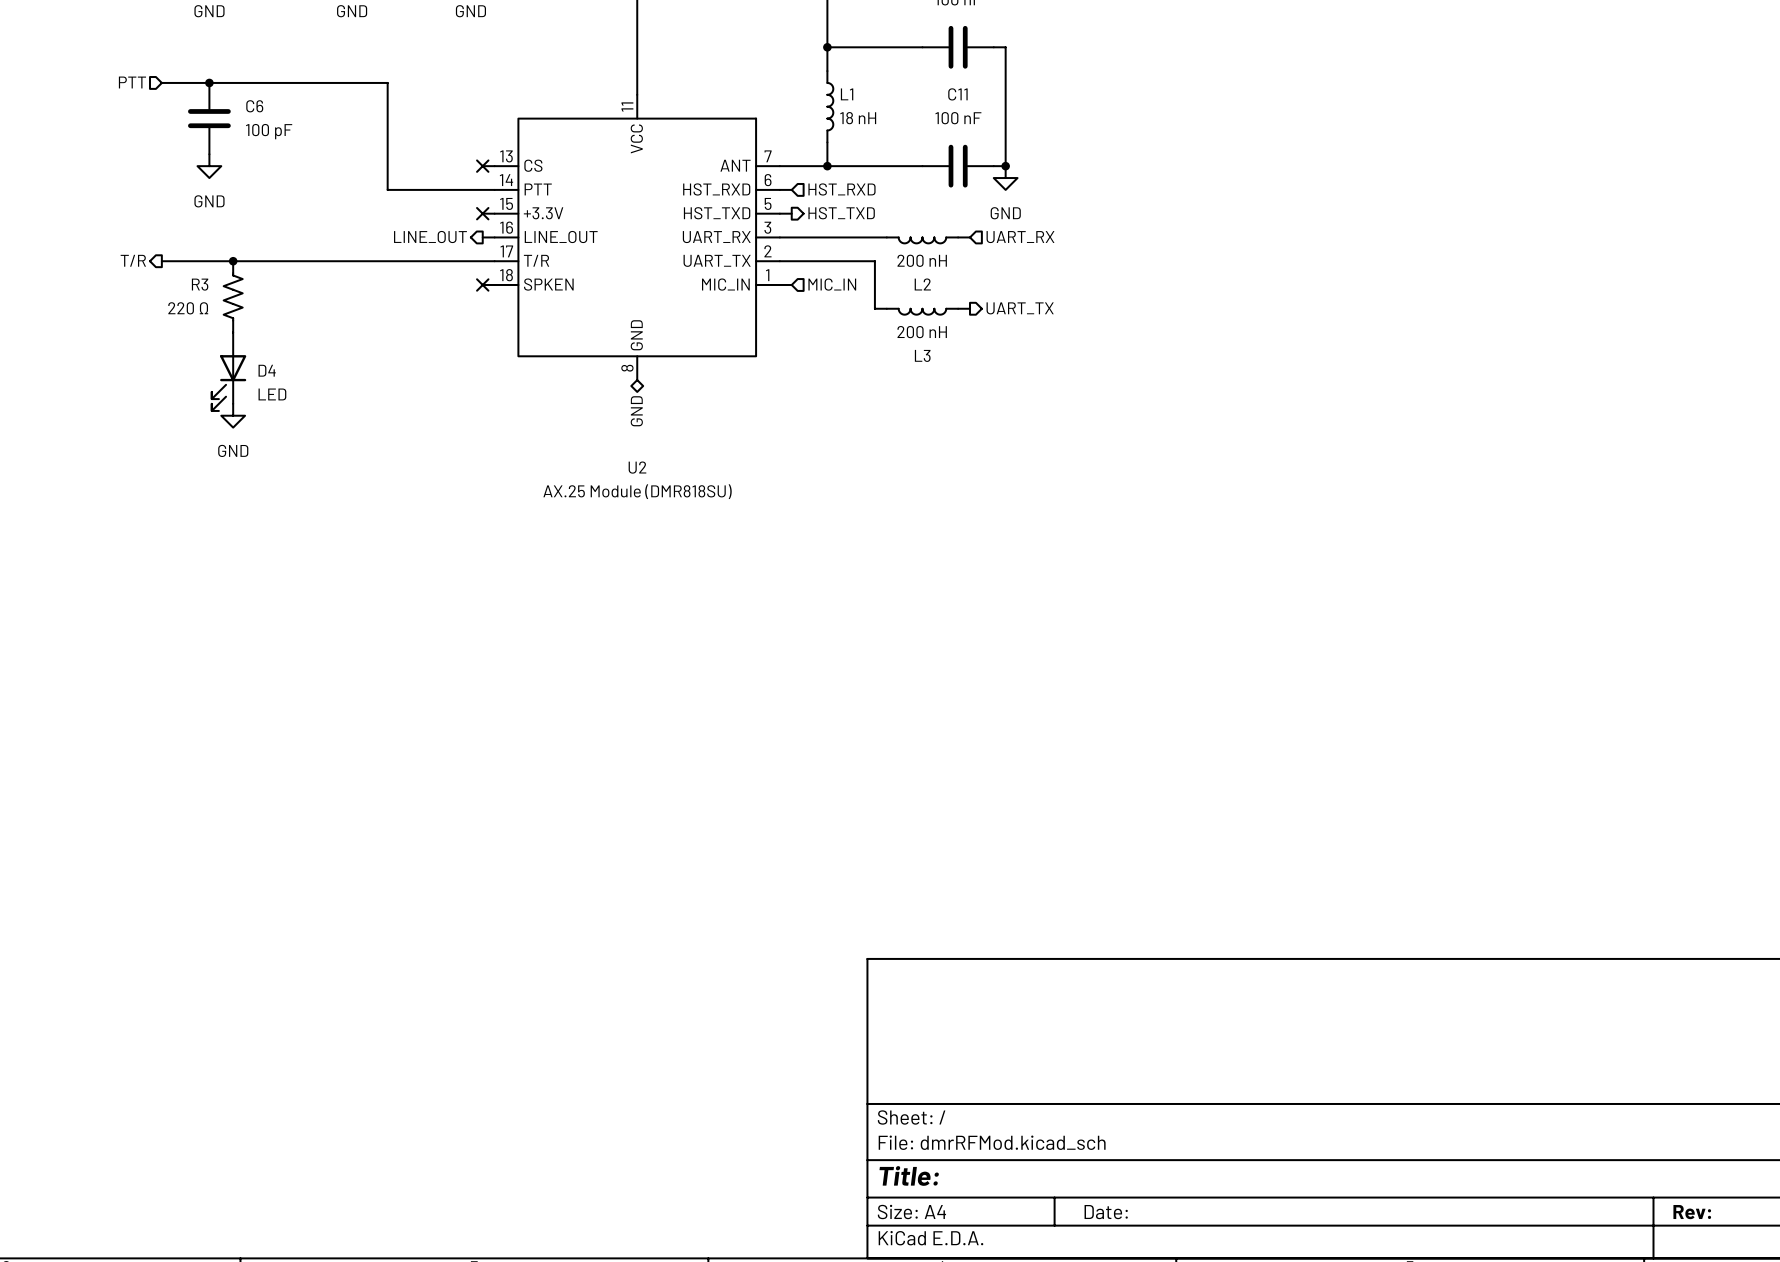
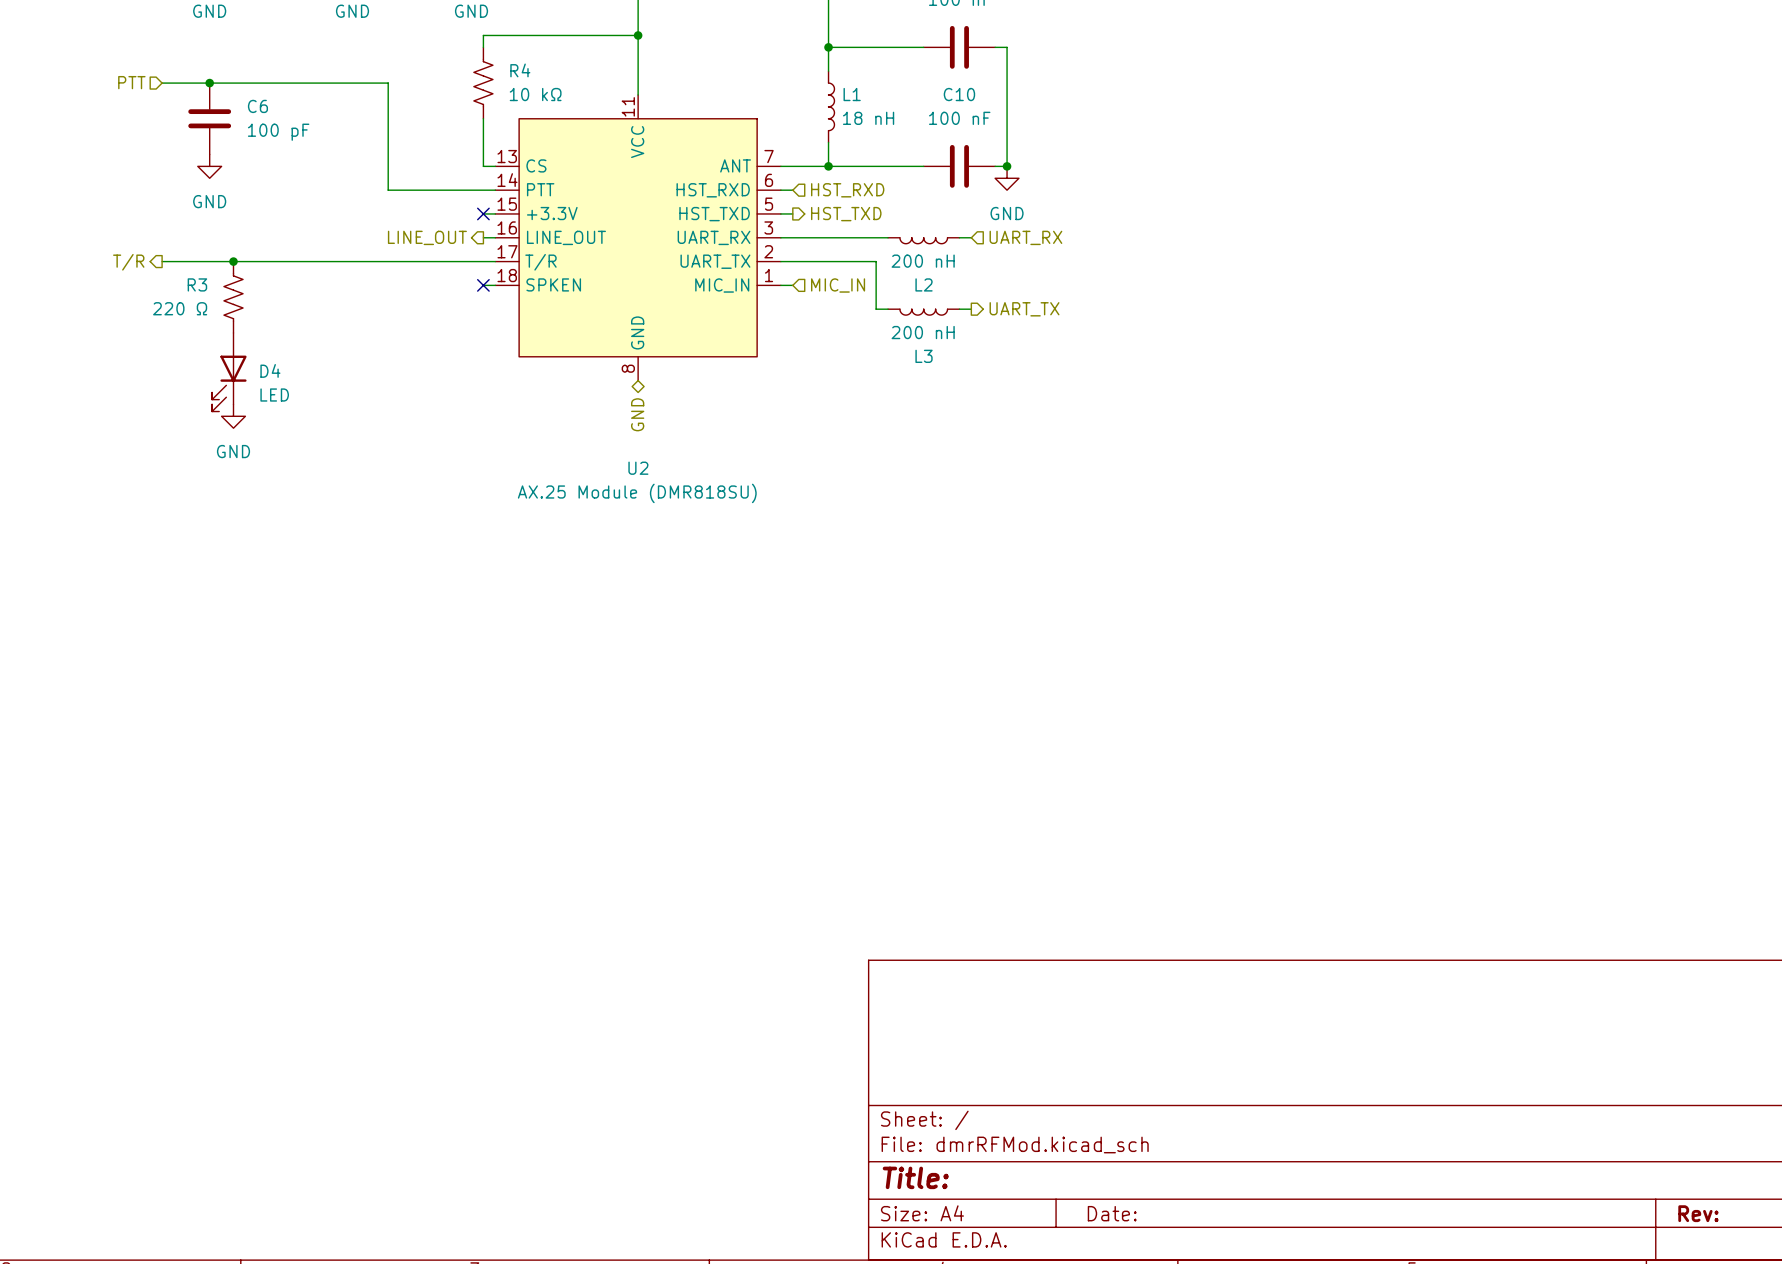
wire: none -> (638, 35) (483, 35) (483, 47)
junction: none -> (638, 35)
R4: none -> 10 kΩ (483, 83)
C11 name: C11 (957, 94) -> C10 (959, 94)
wire: none -> (483, 118) (483, 166)
no-connect mark: (482, 166) -> none

